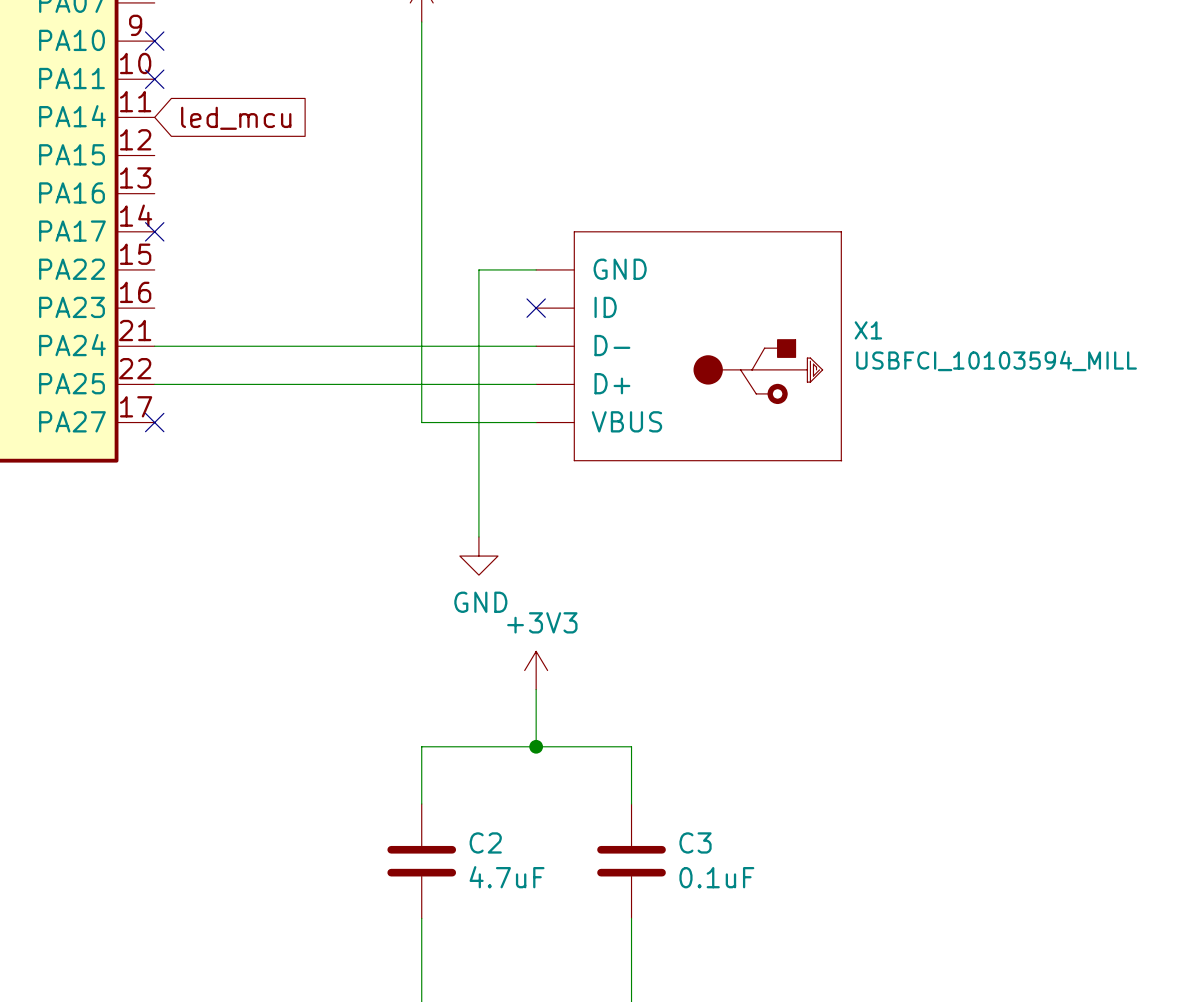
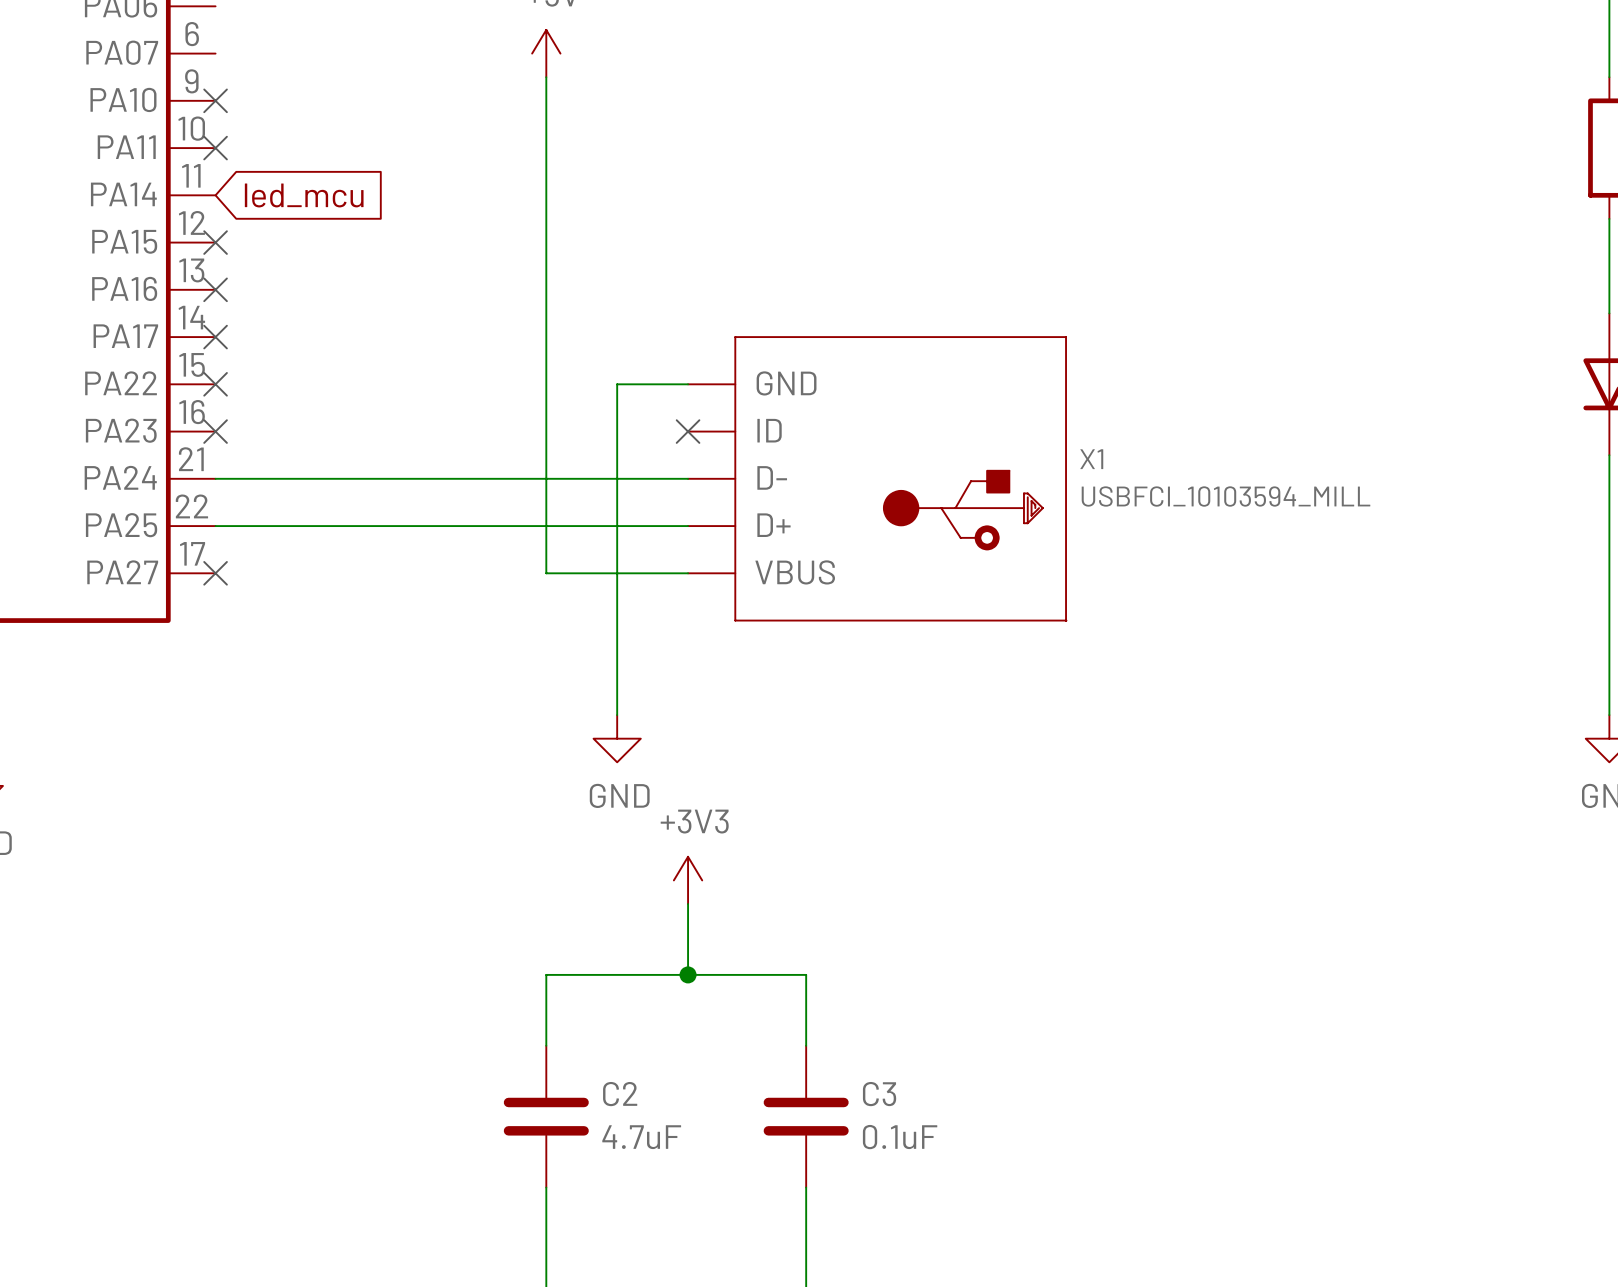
no-connect mark: none -> (215, 242)
no-connect mark: none -> (215, 289)
no-connect mark: none -> (215, 384)
no-connect mark: none -> (215, 431)

